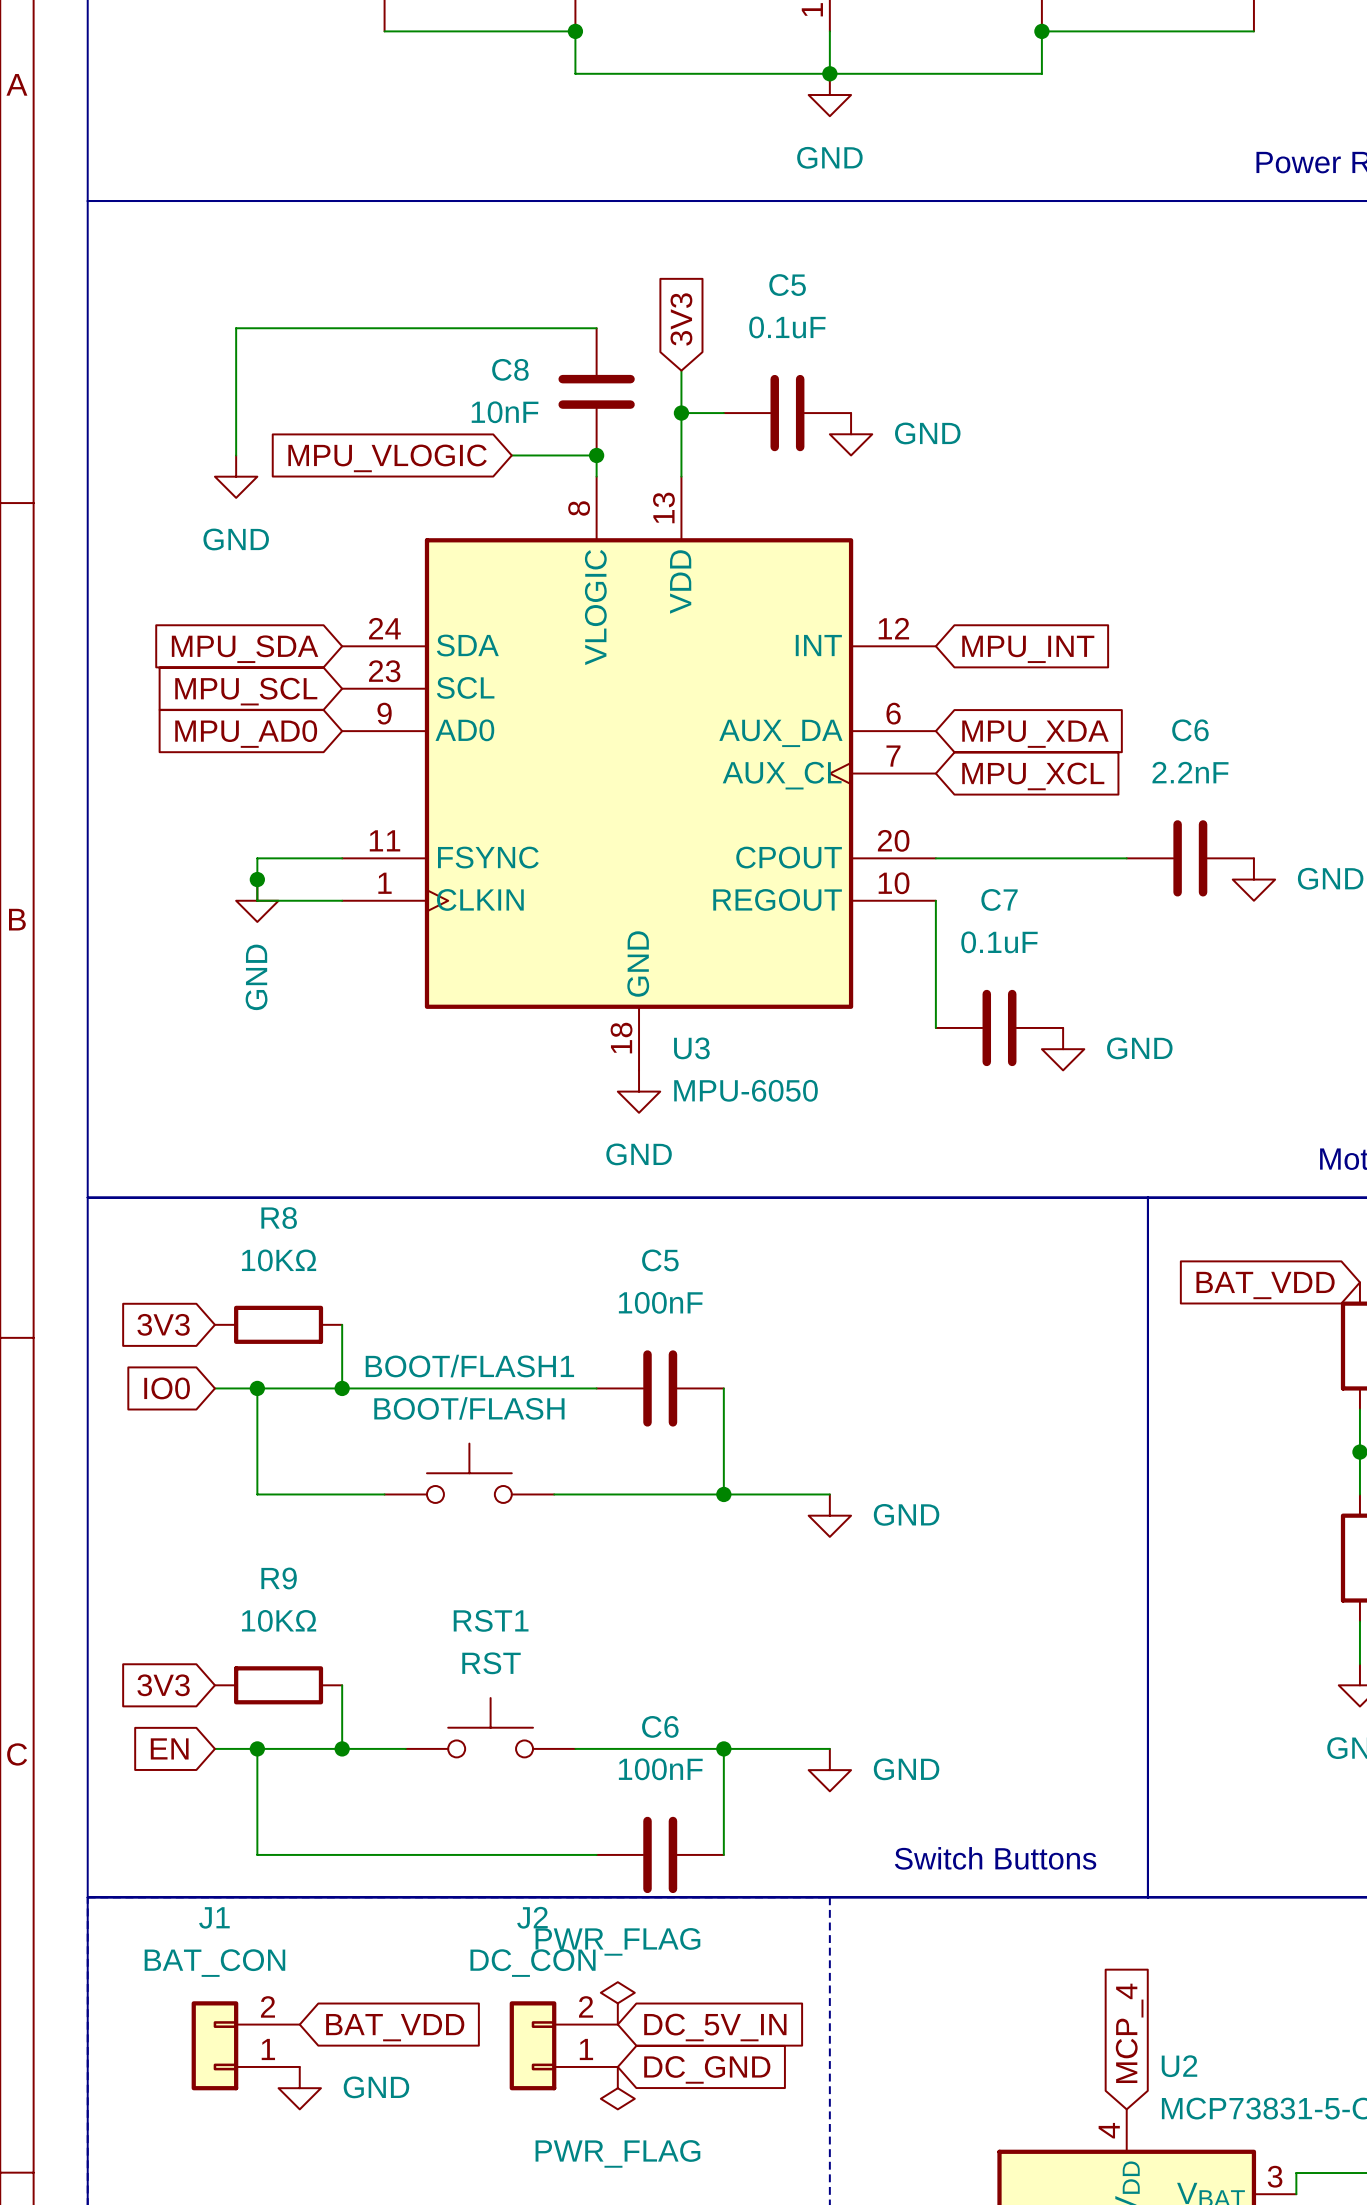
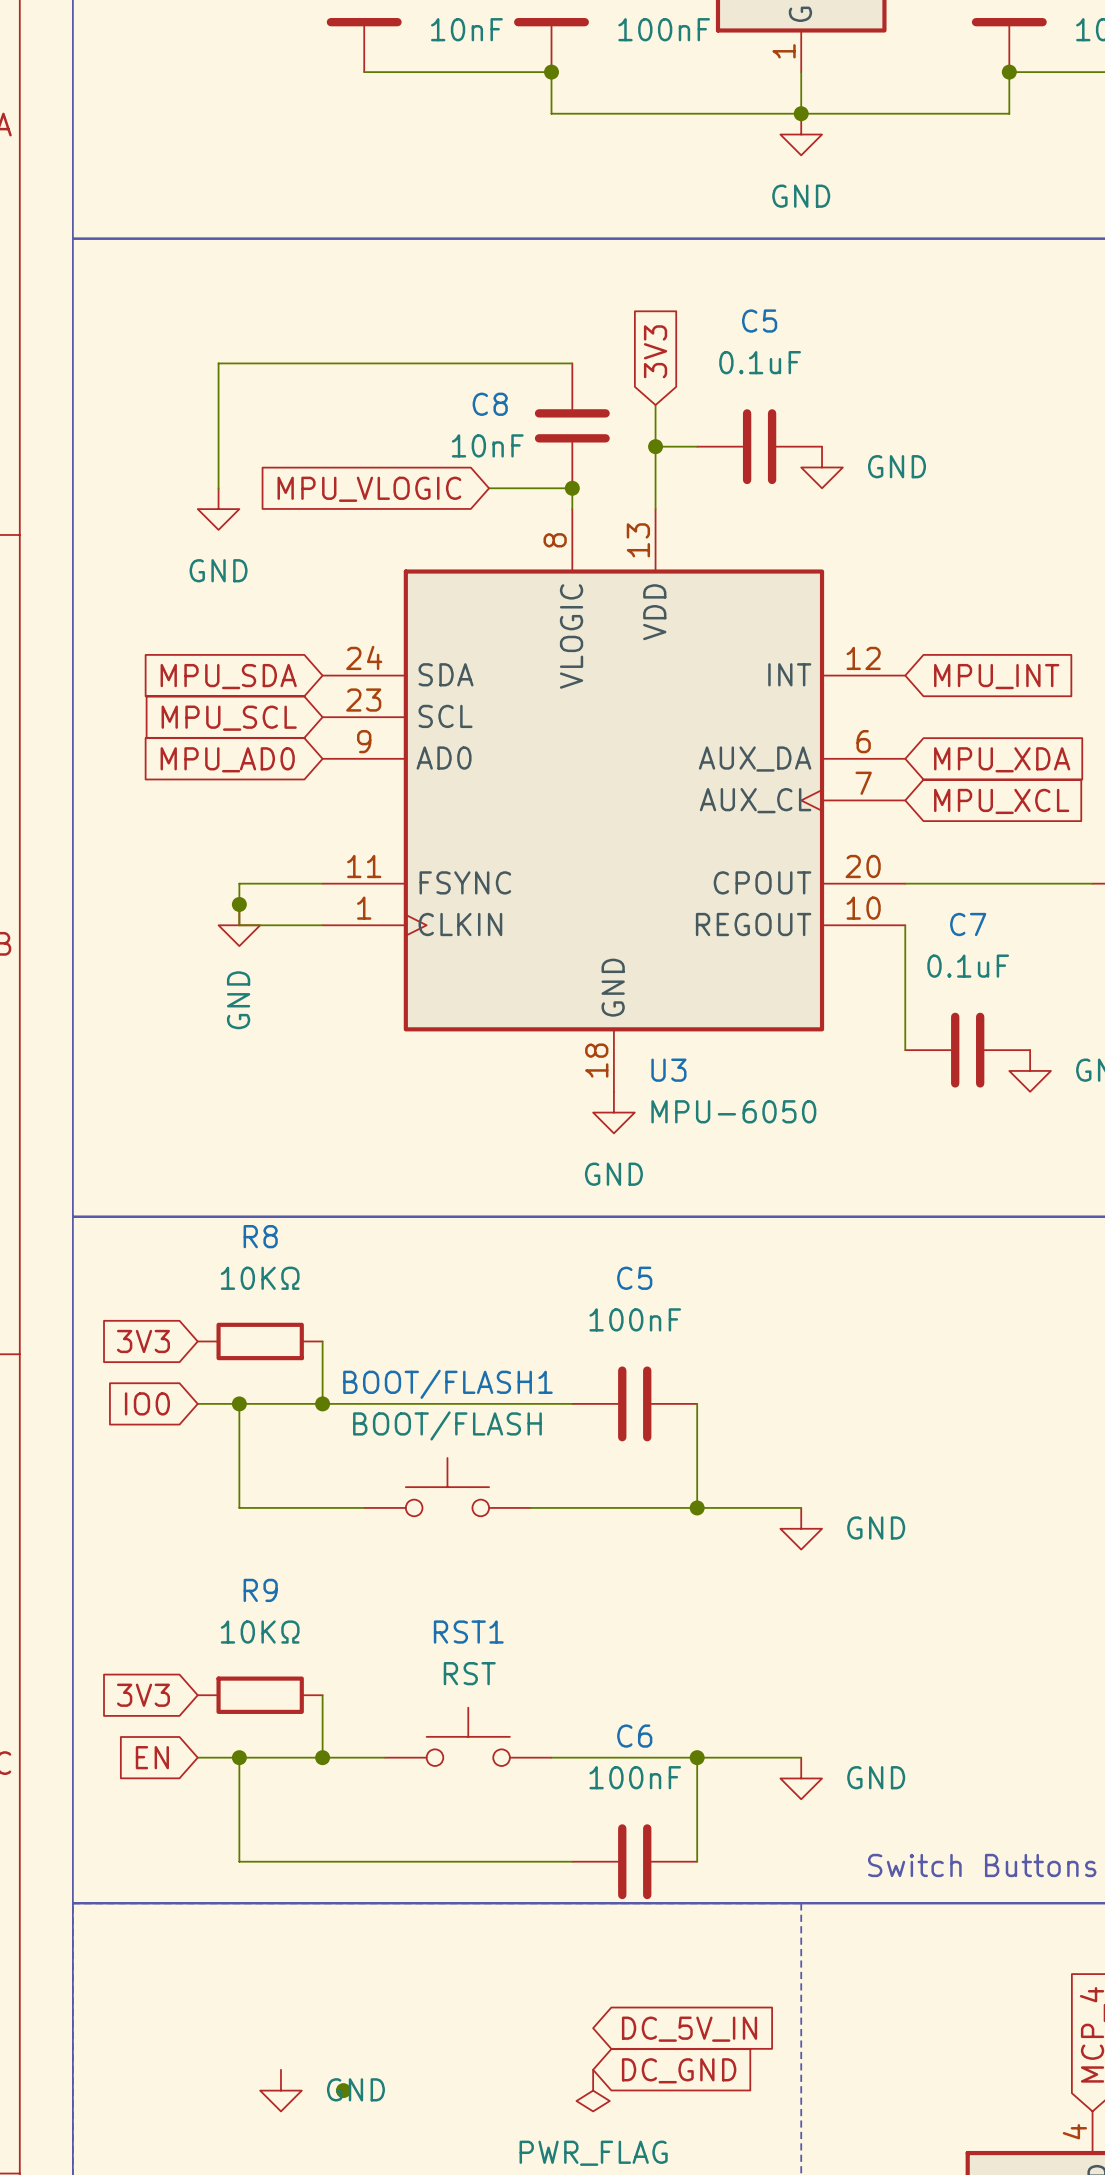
power symbol: PWR_FLAG (617, 2003) -> none
global label: BAT_VDD (395, 2027) -> none
J1: BAT_CON (245, 2045) -> none
J2: DC_CON (563, 2045) -> none
junction: none -> (343, 2090)

